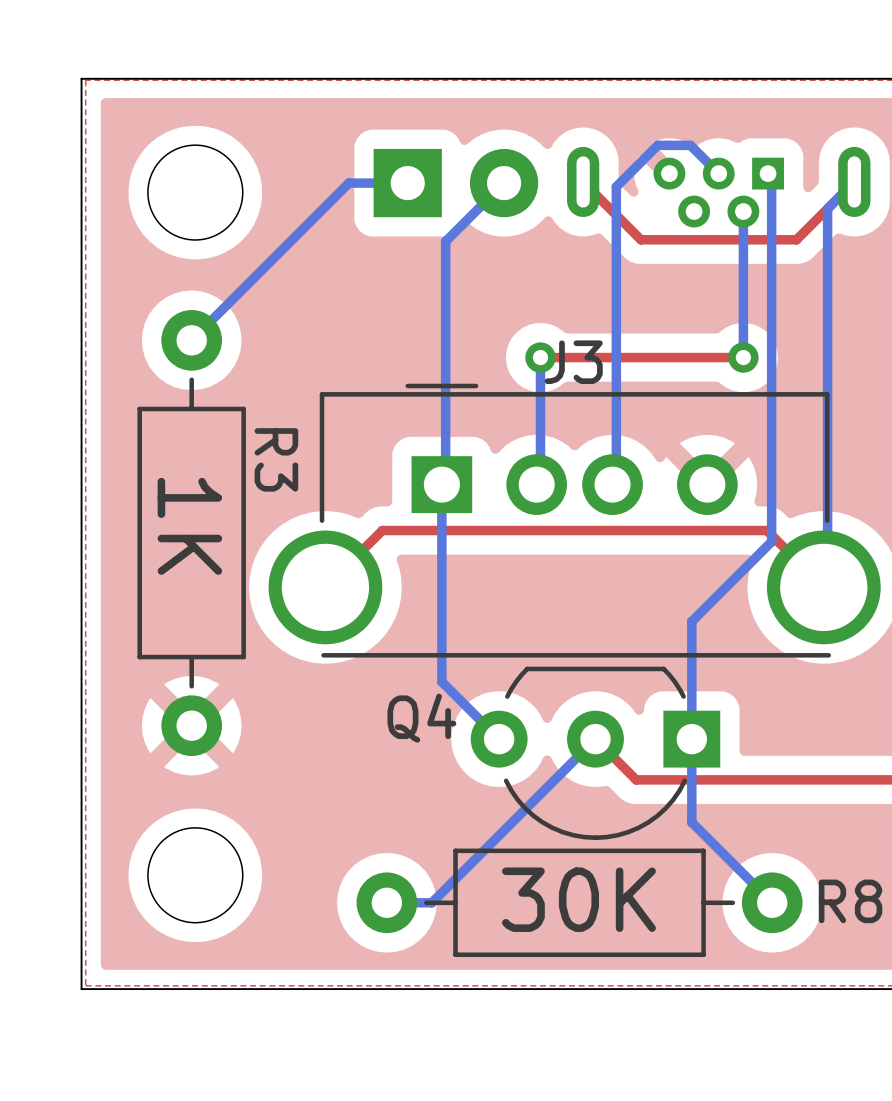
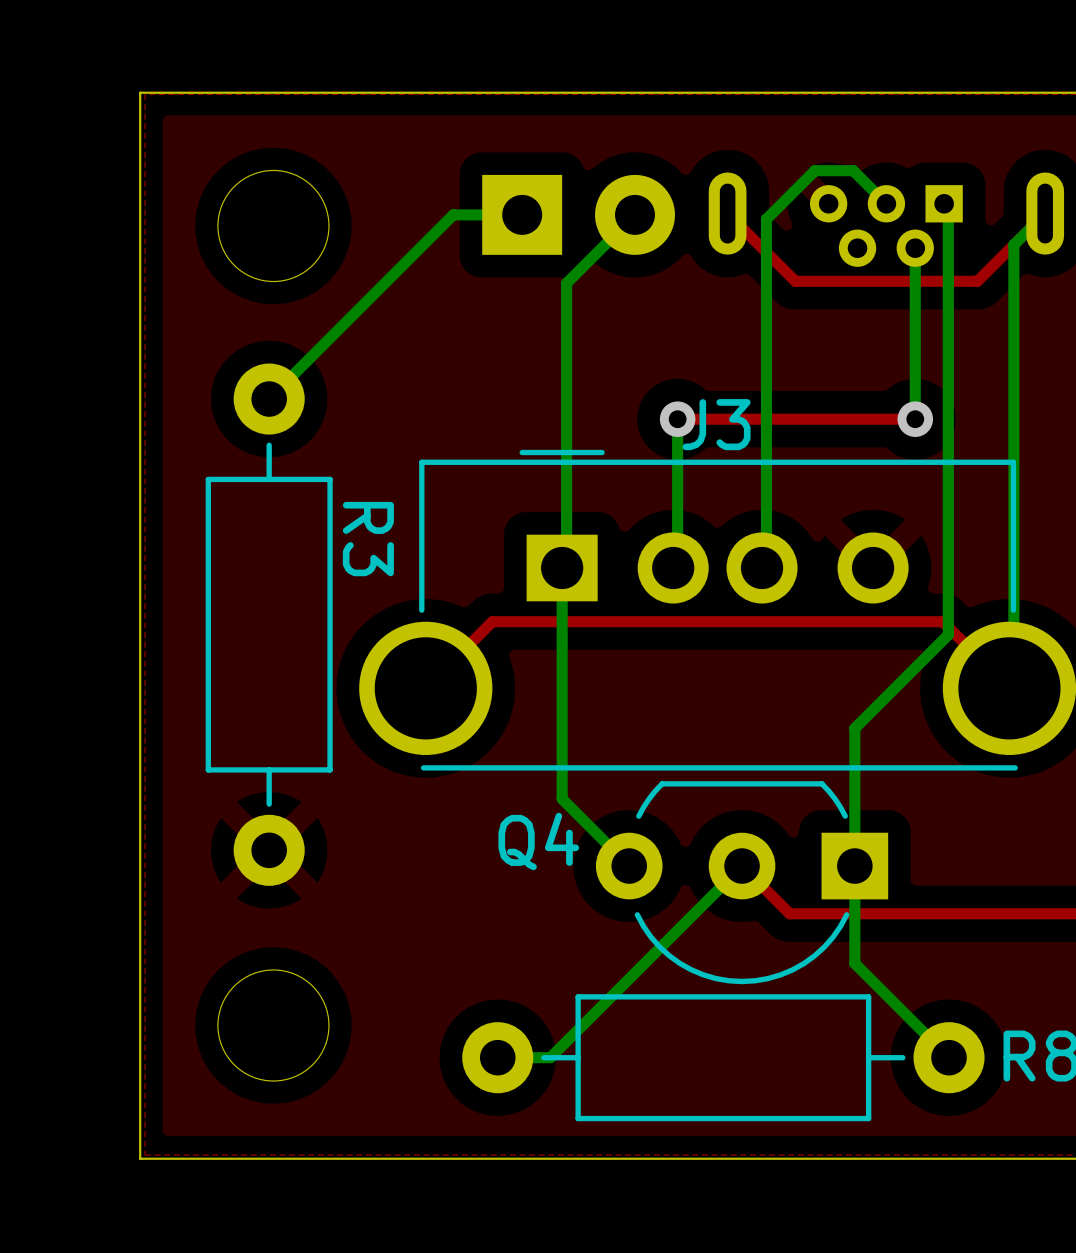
text: 1K (189, 526) -> none
text: 30K (578, 899) -> none

